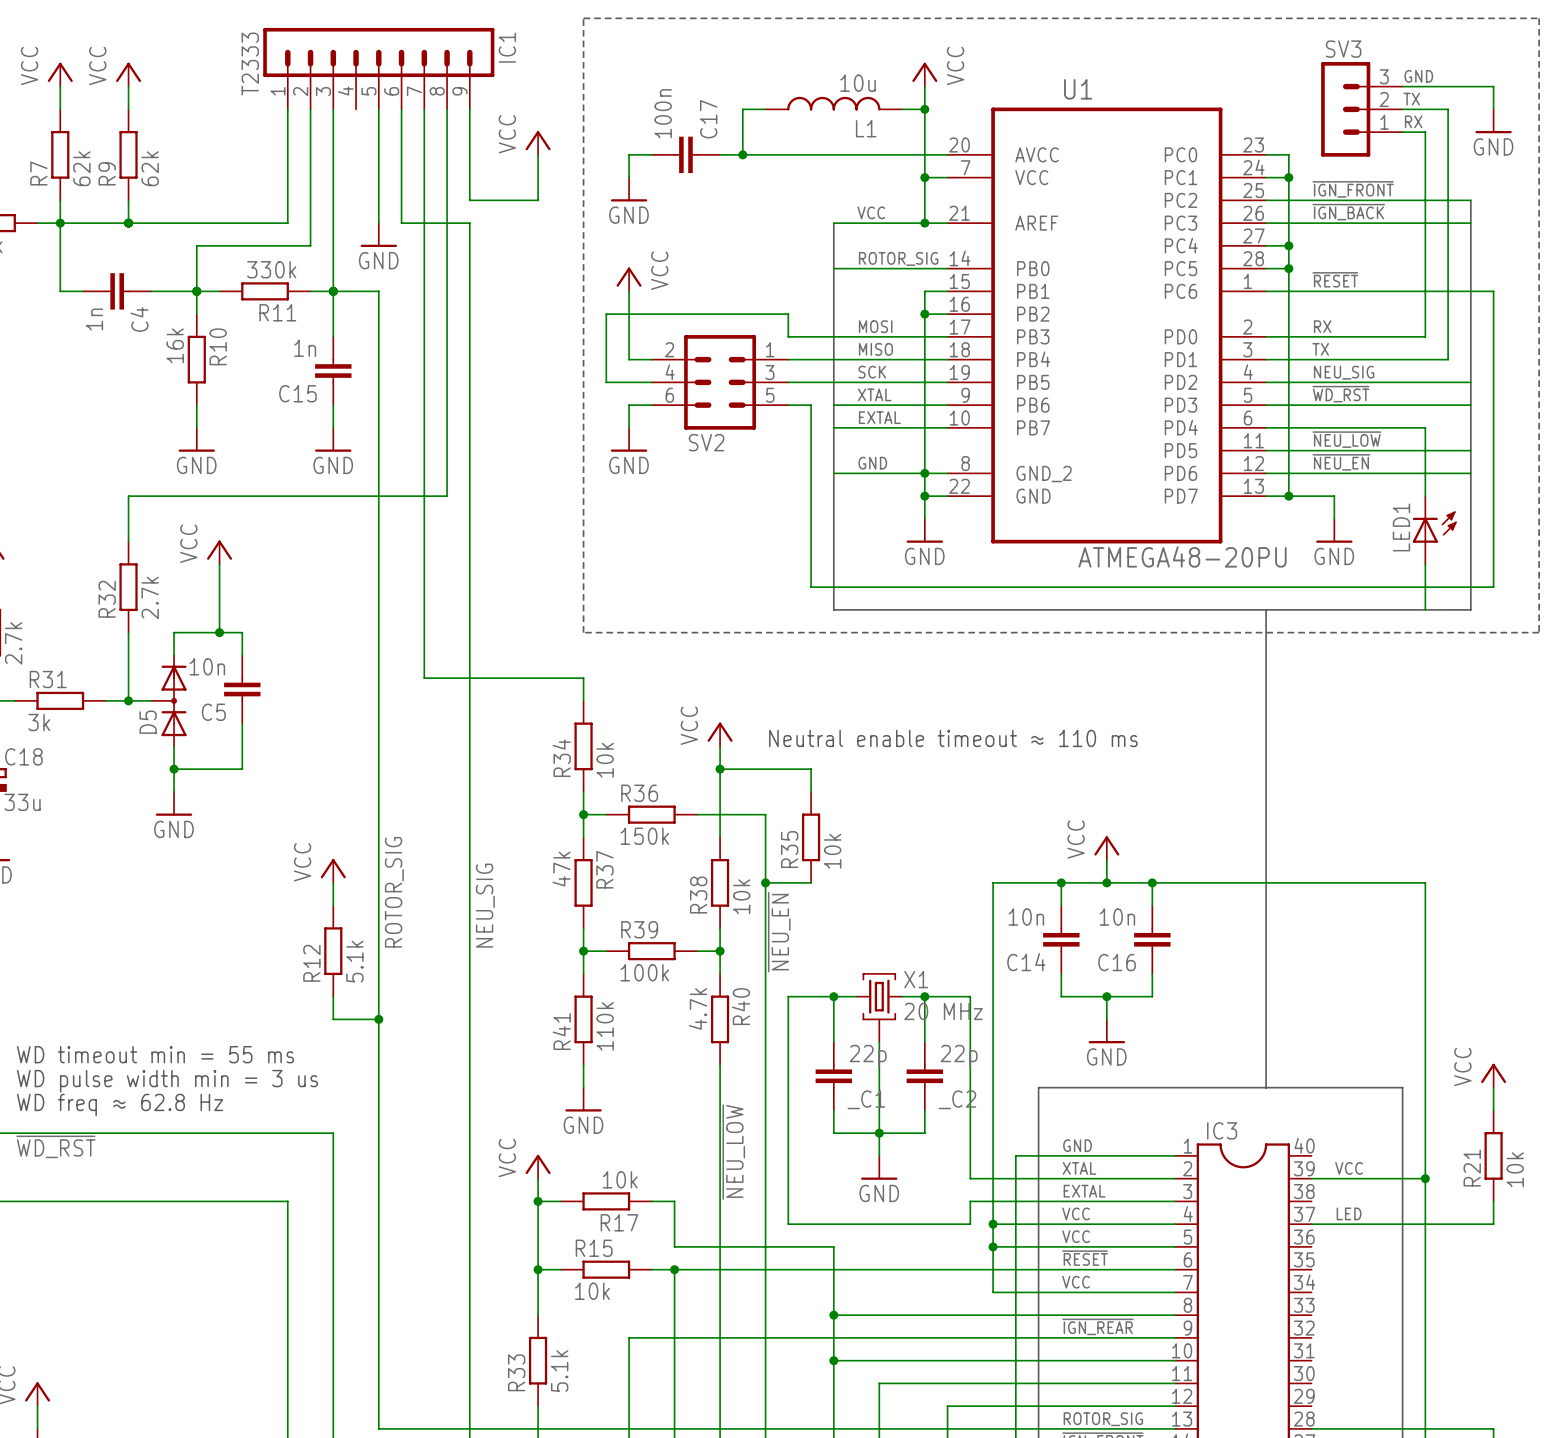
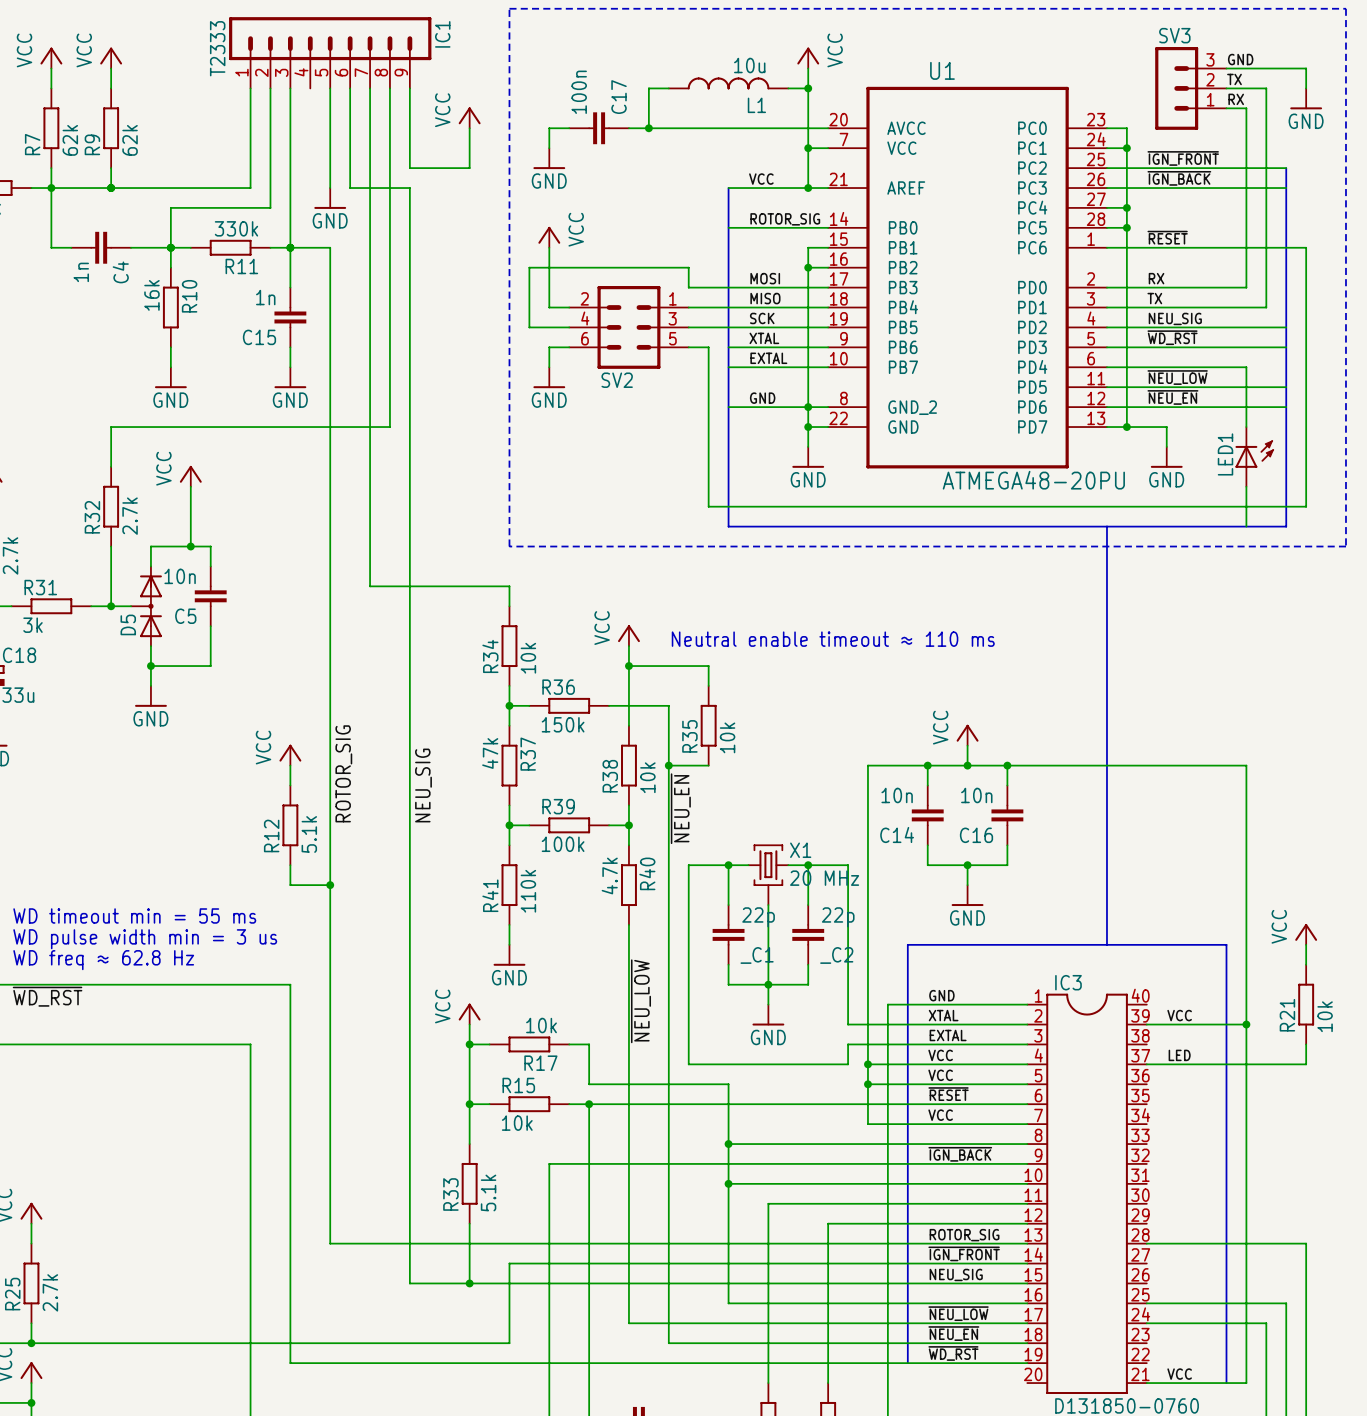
label: ~{IGN_REAR} (1098, 1326) -> ~{IGN_BACK} (960, 1154)

